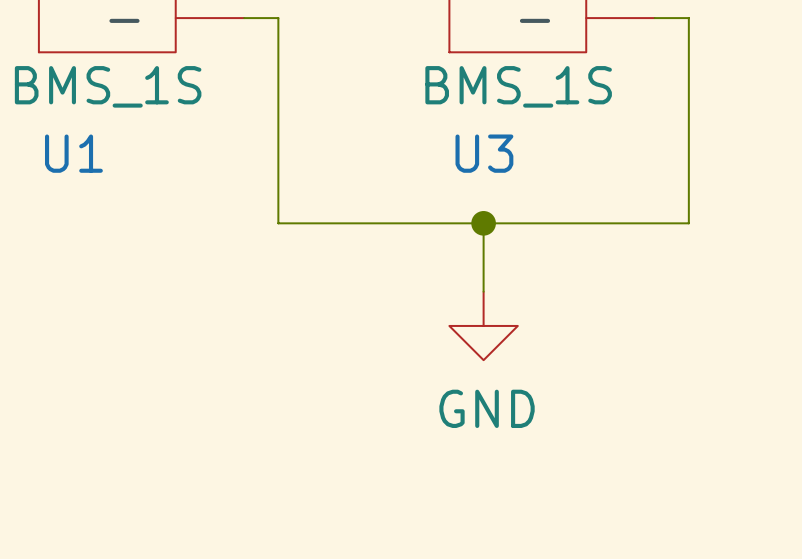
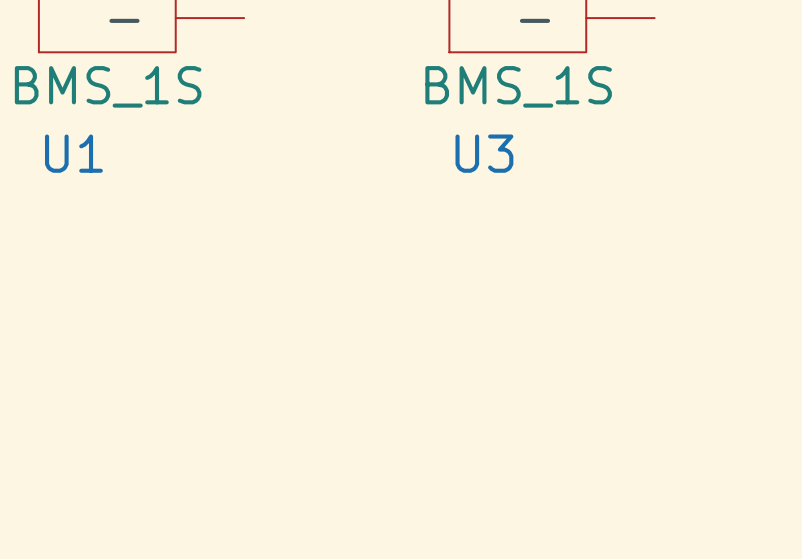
wire: (244, 18) (278, 18) (278, 223) (688, 223) (688, 18) (654, 18) -> none
wire: (483, 223) (483, 291) -> none
junction: (483, 223) -> none
power symbol: GND (483, 325) -> none

